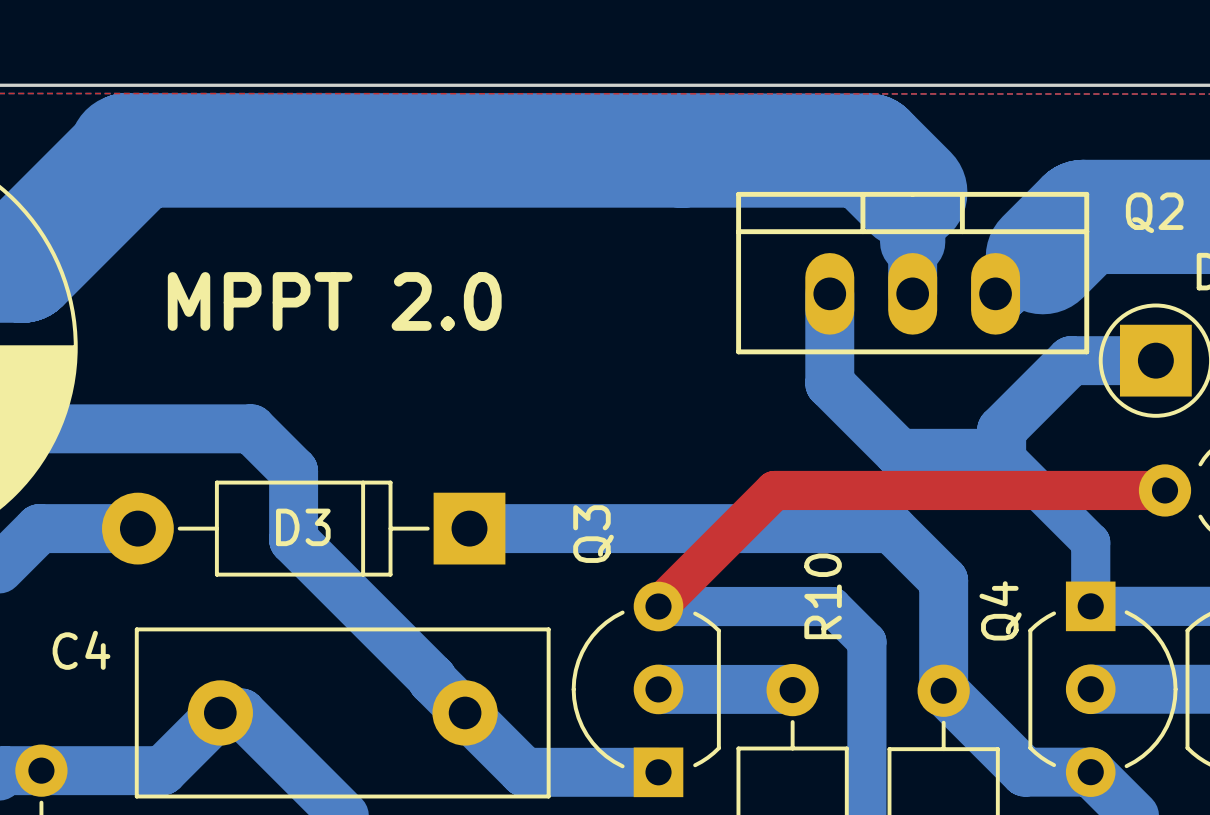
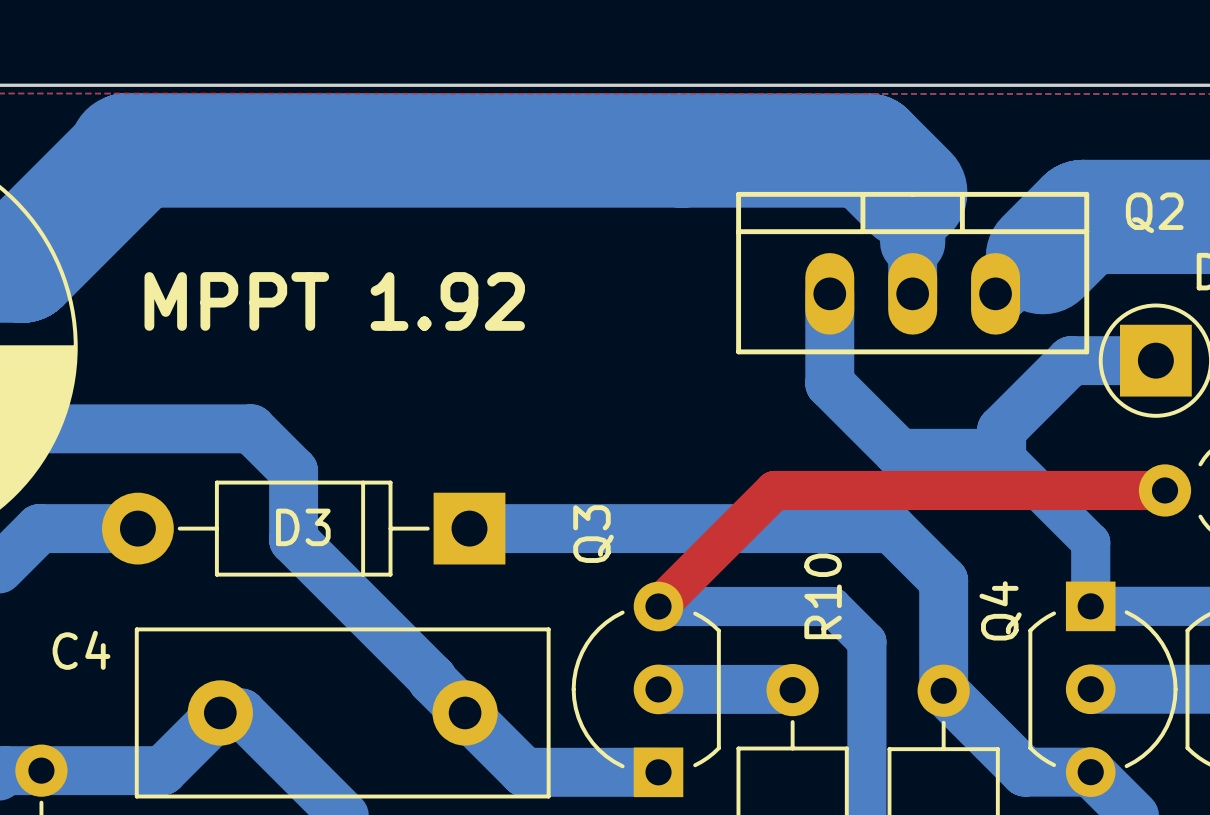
text: MPPT 2.0 (334, 301) -> MPPT 1.92 (334, 301)

